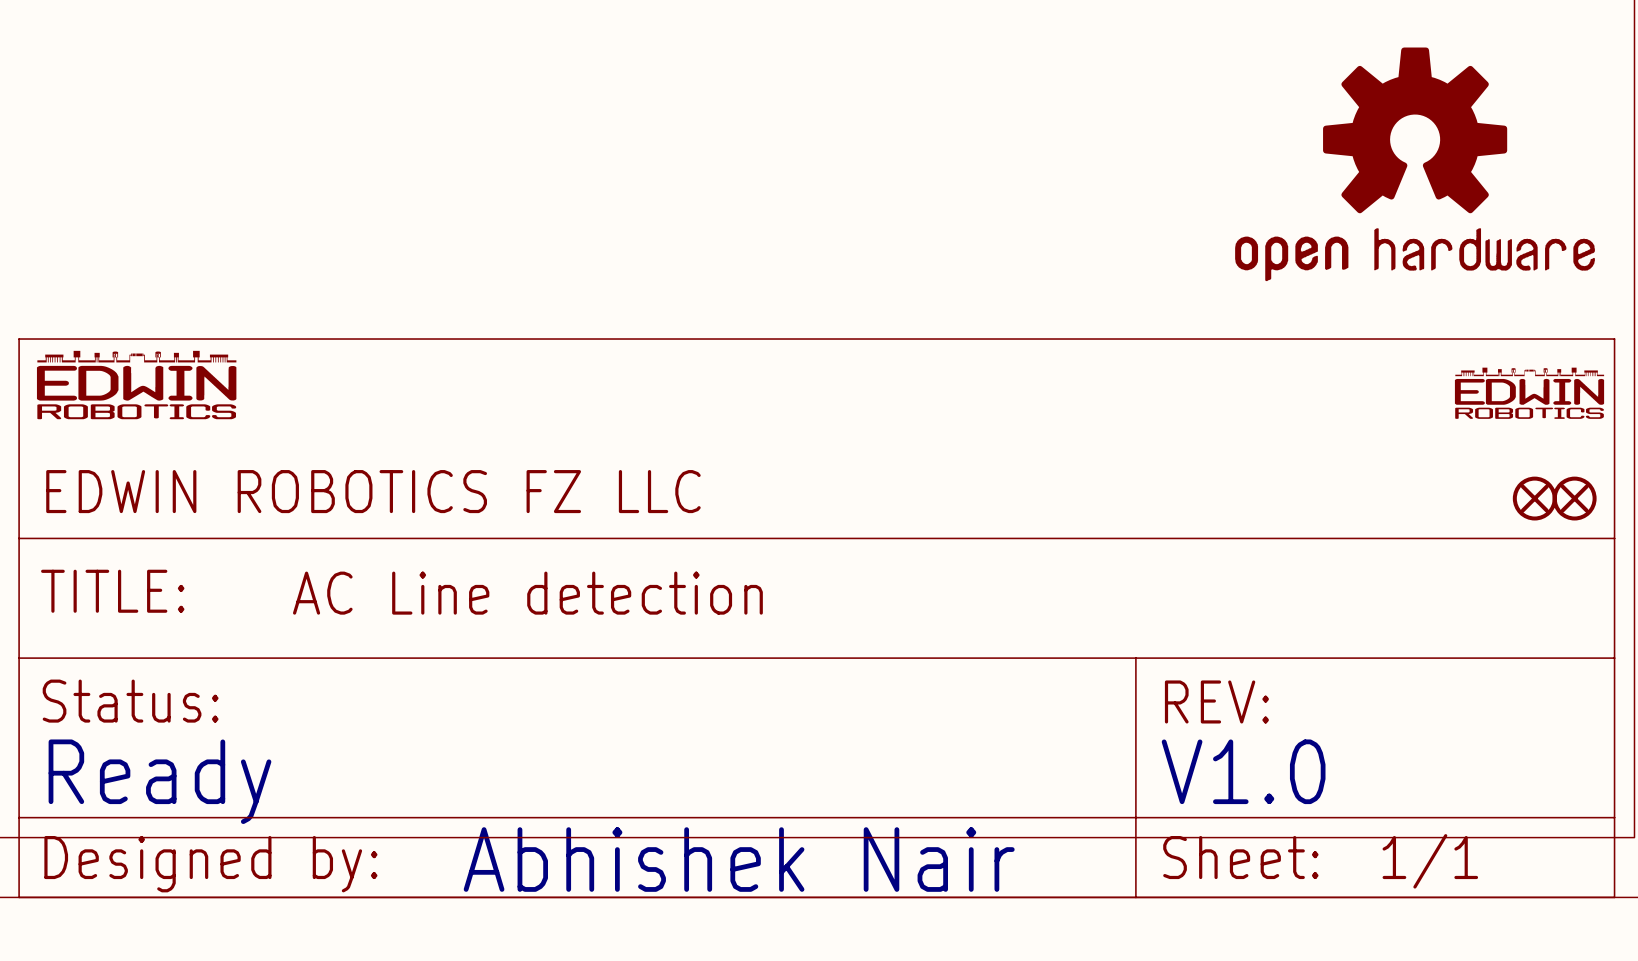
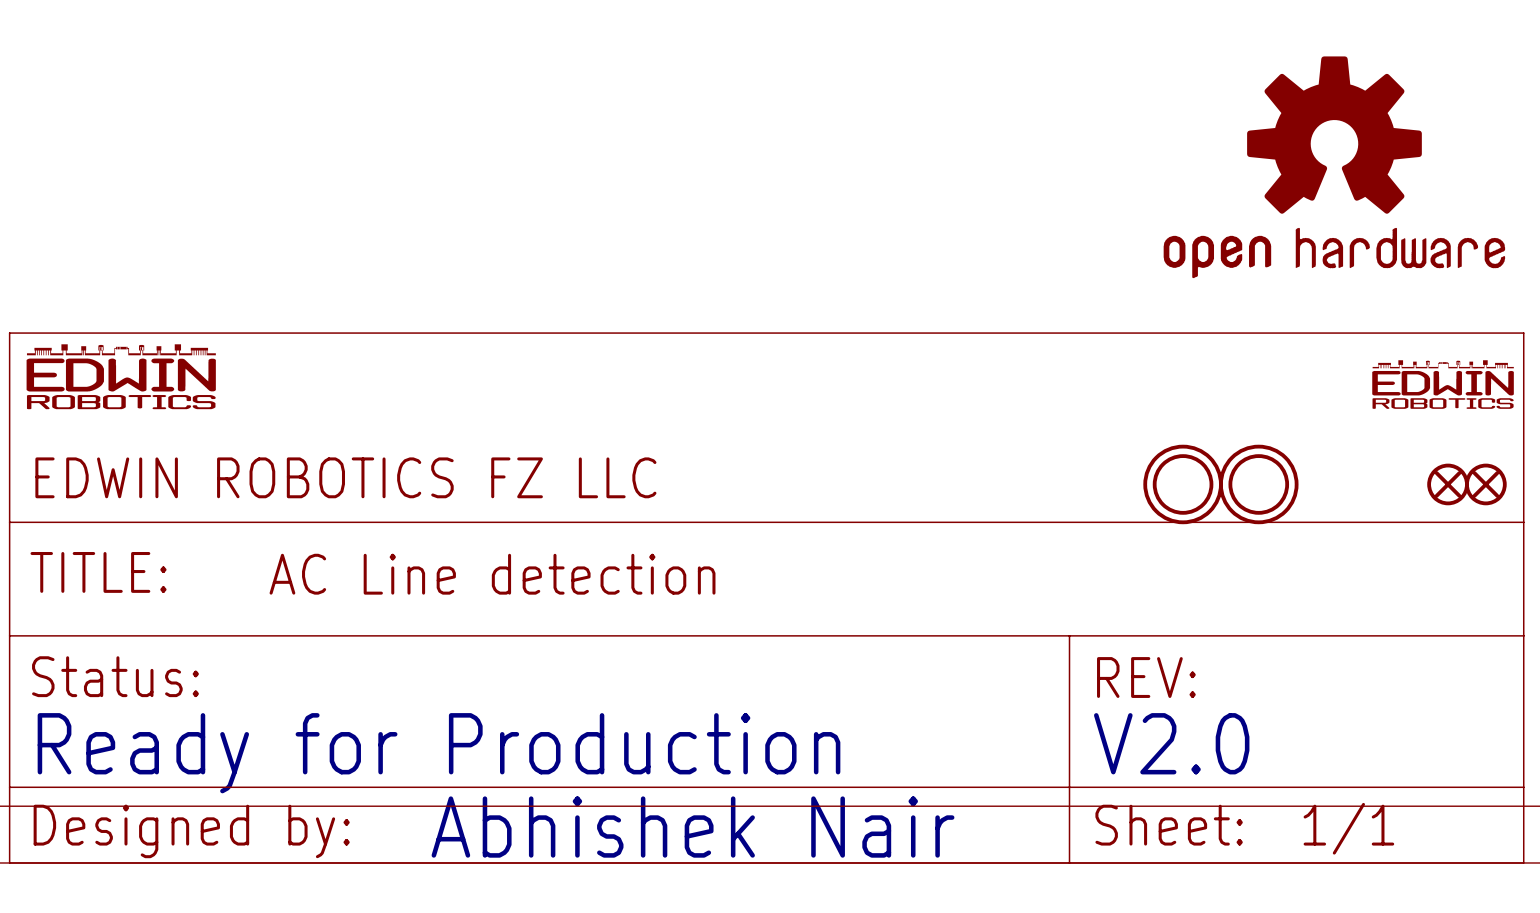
part: none -> (1183, 484)
part: none -> (1258, 484)
text: V1.0 (1243, 771) -> V2.0 (1171, 743)
text: Ready (159, 781) -> Ready for Production (439, 753)

